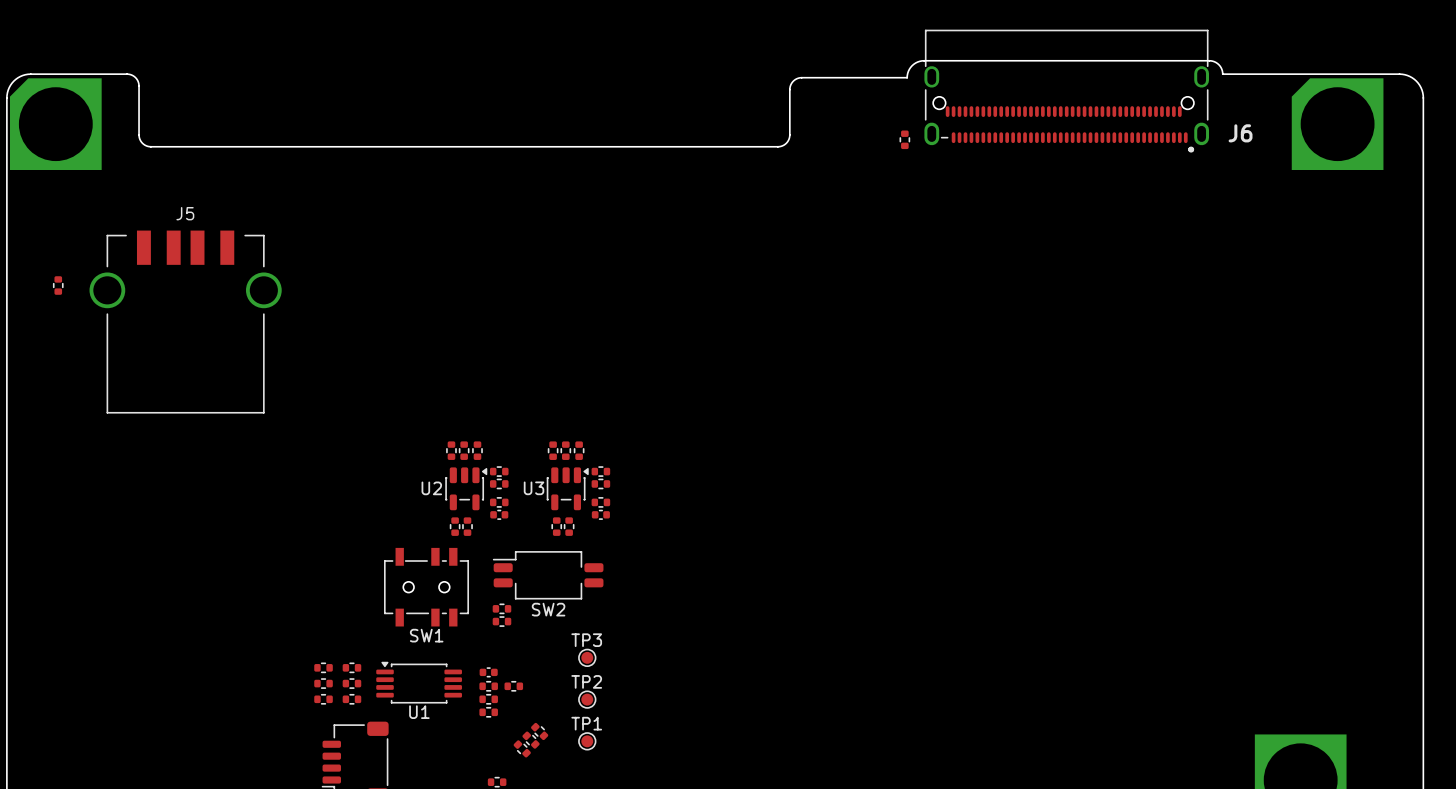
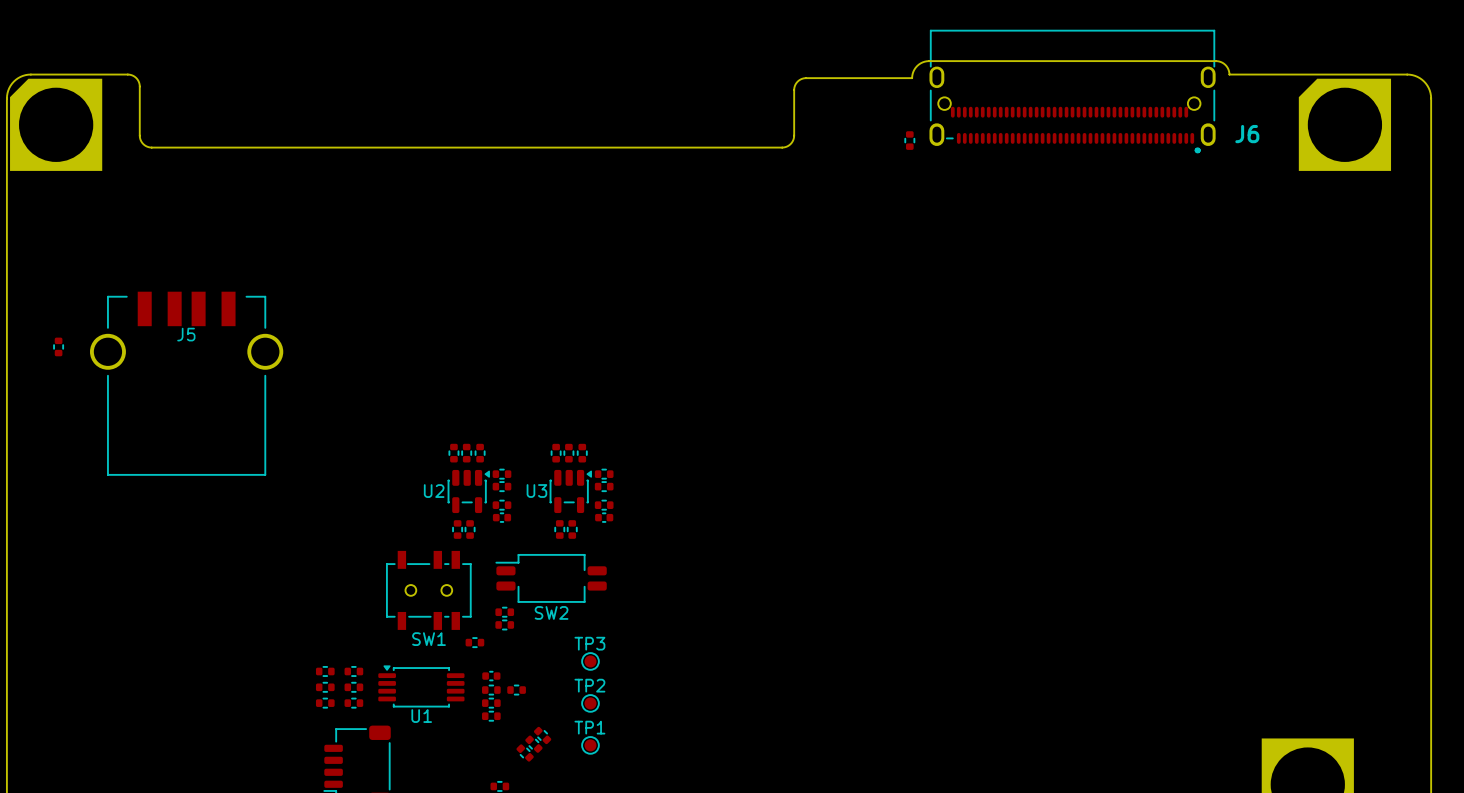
J5 name position: J5 (185, 213) -> J5 (186, 334)
part position: (58, 285) -> (58, 346)
J5 position: (185, 321) -> (186, 383)
part: none -> (474, 642)

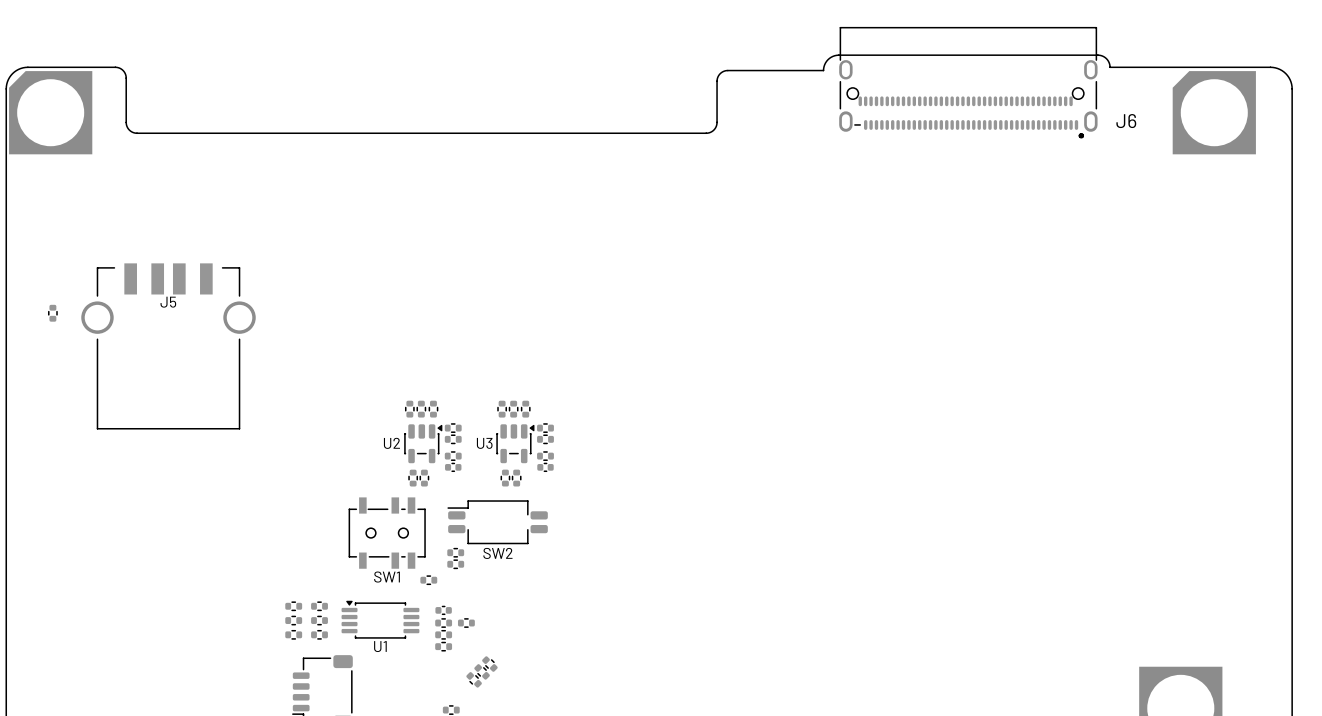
part: (909, 140) -> none
TP3: (590, 661) -> none
TP2: (590, 703) -> none
TP1: (590, 745) -> none

